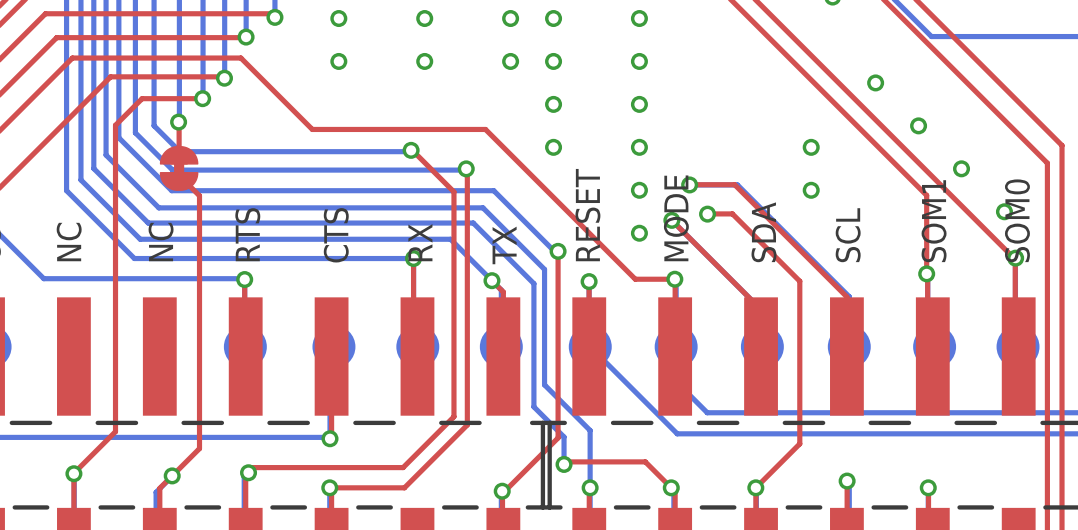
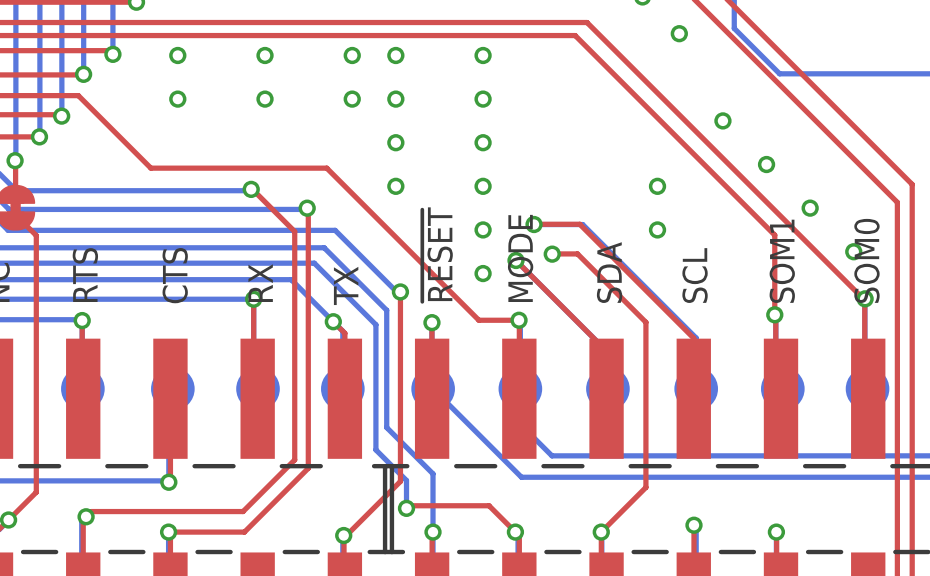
text: RESET (587, 215) -> ~{RESET} (437, 254)

